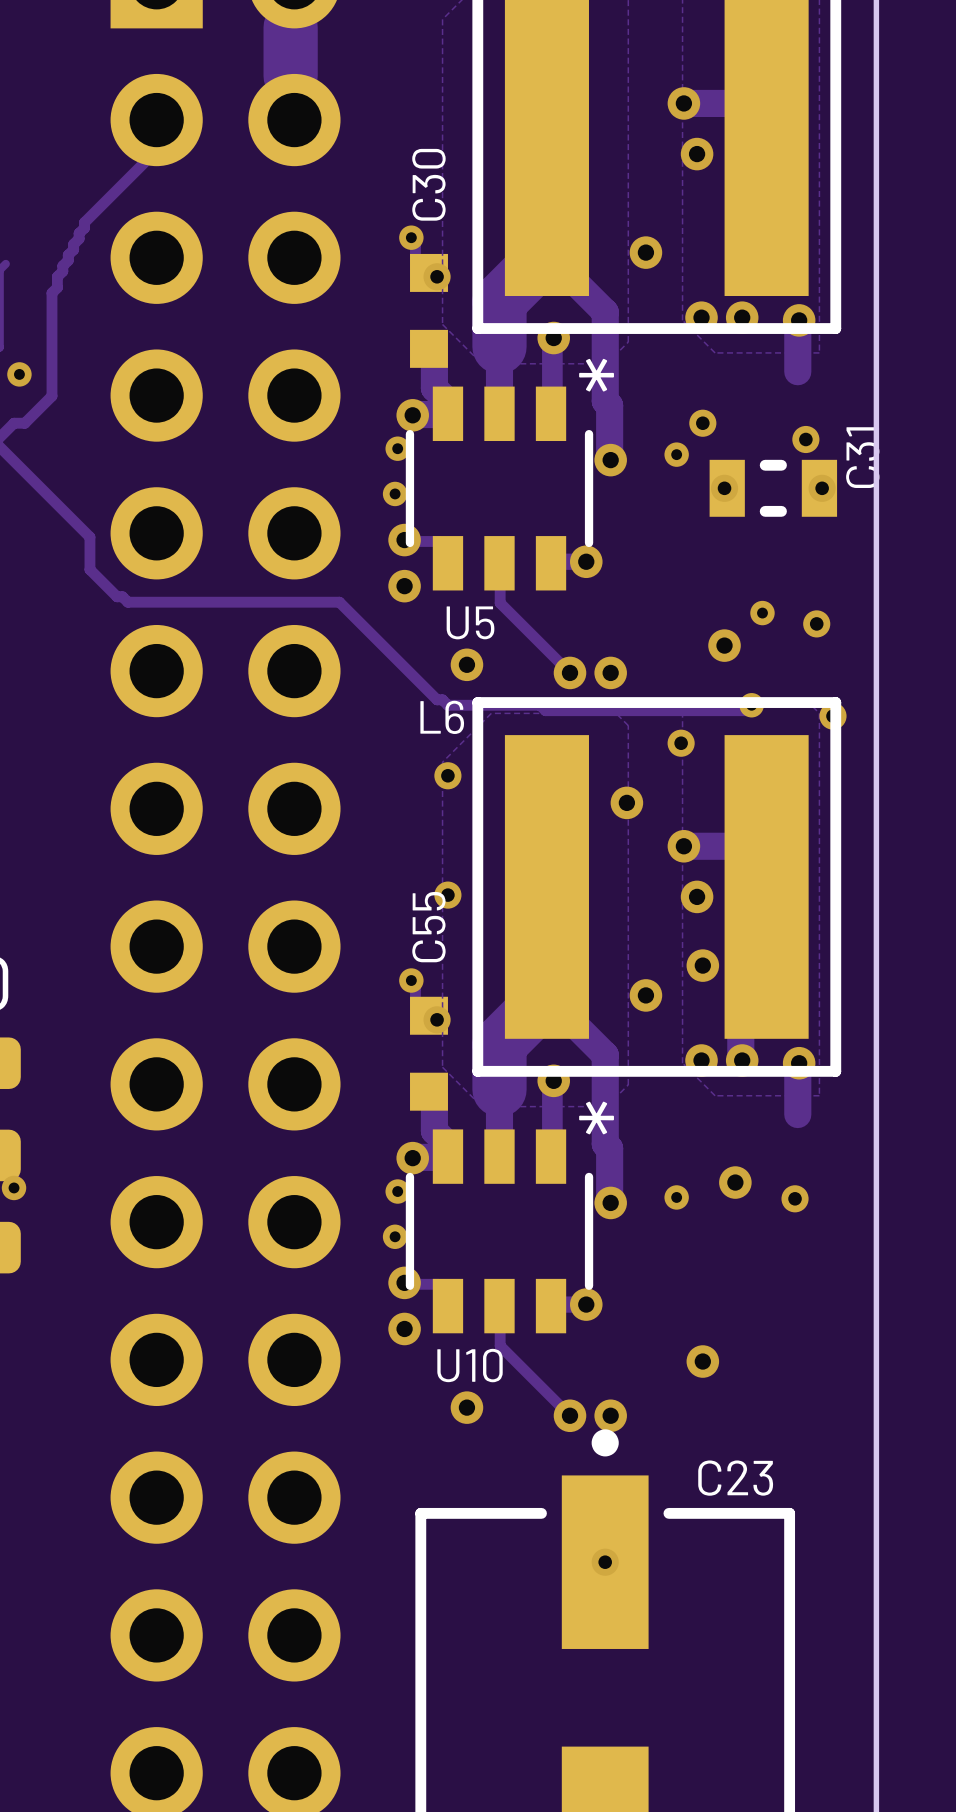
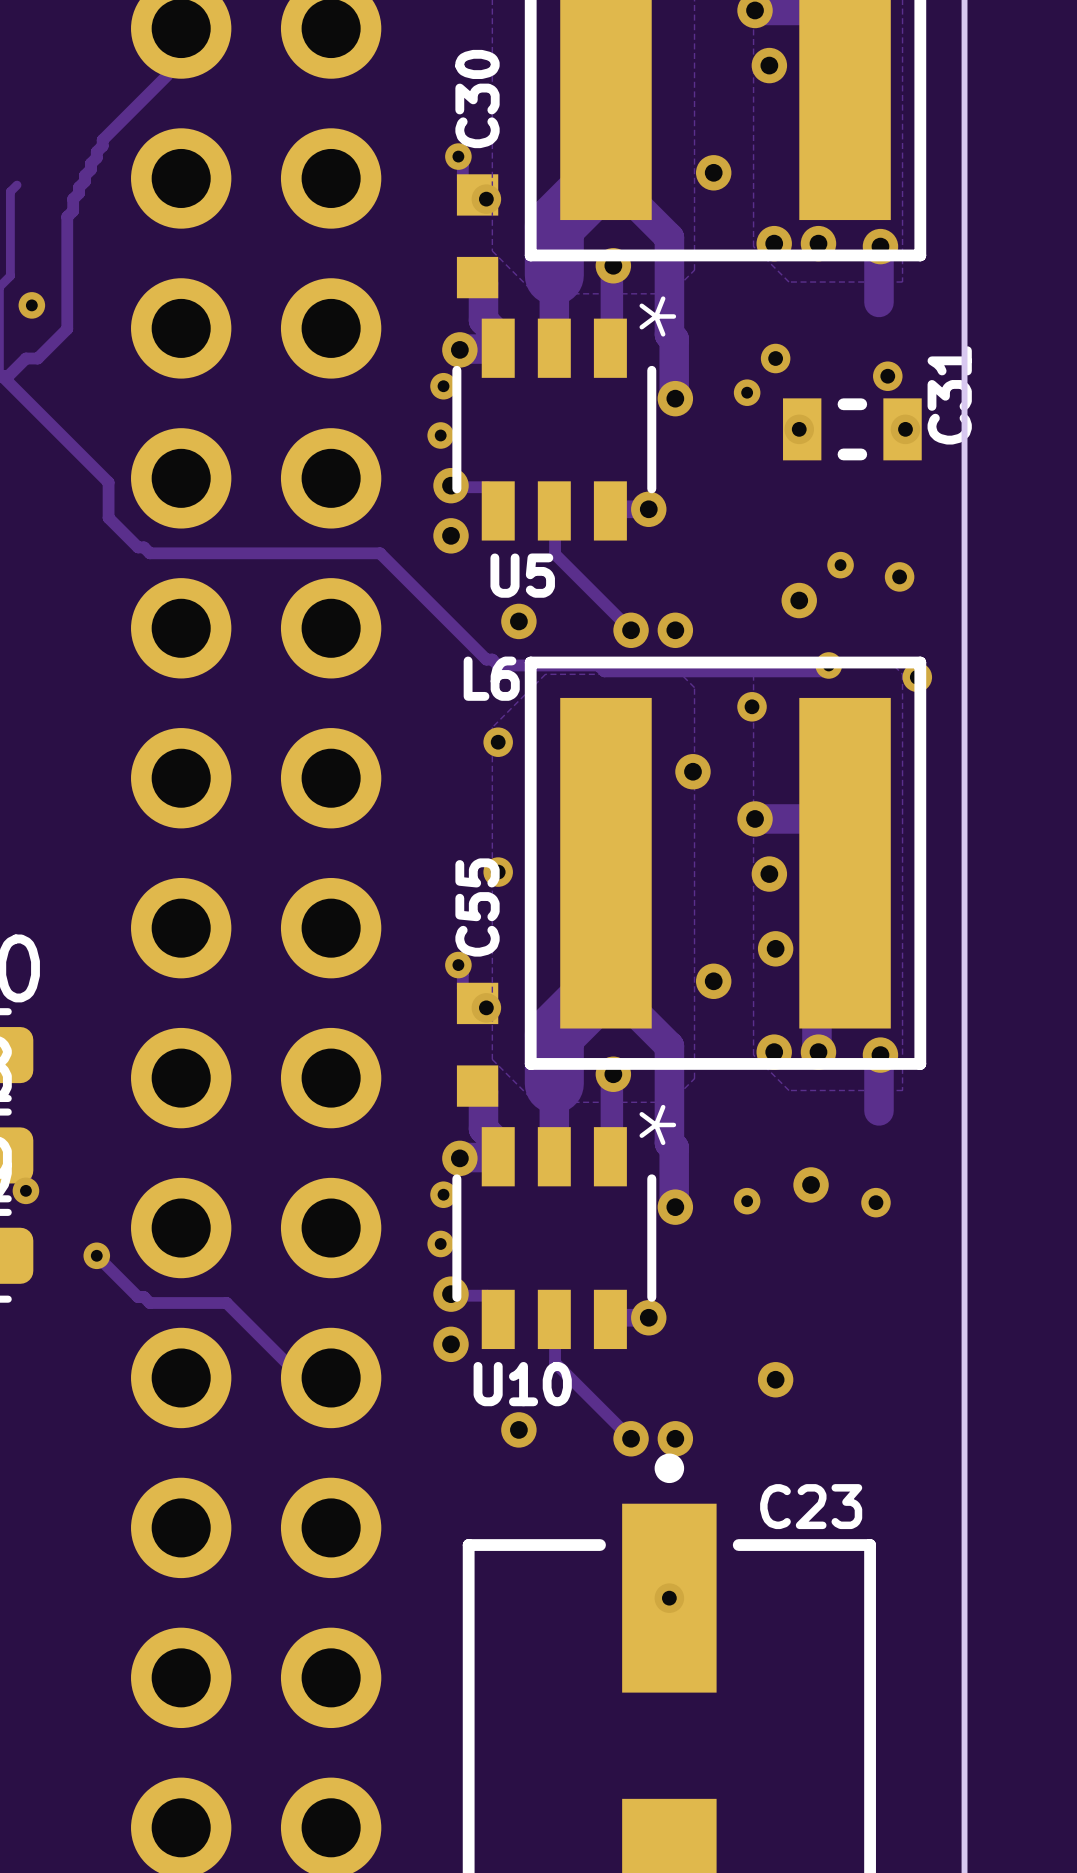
track: none -> (96, 1255) (138, 1297) (144, 1297) (149, 1303) (226, 1303) (285, 1362)
via: none -> (96, 1255)

